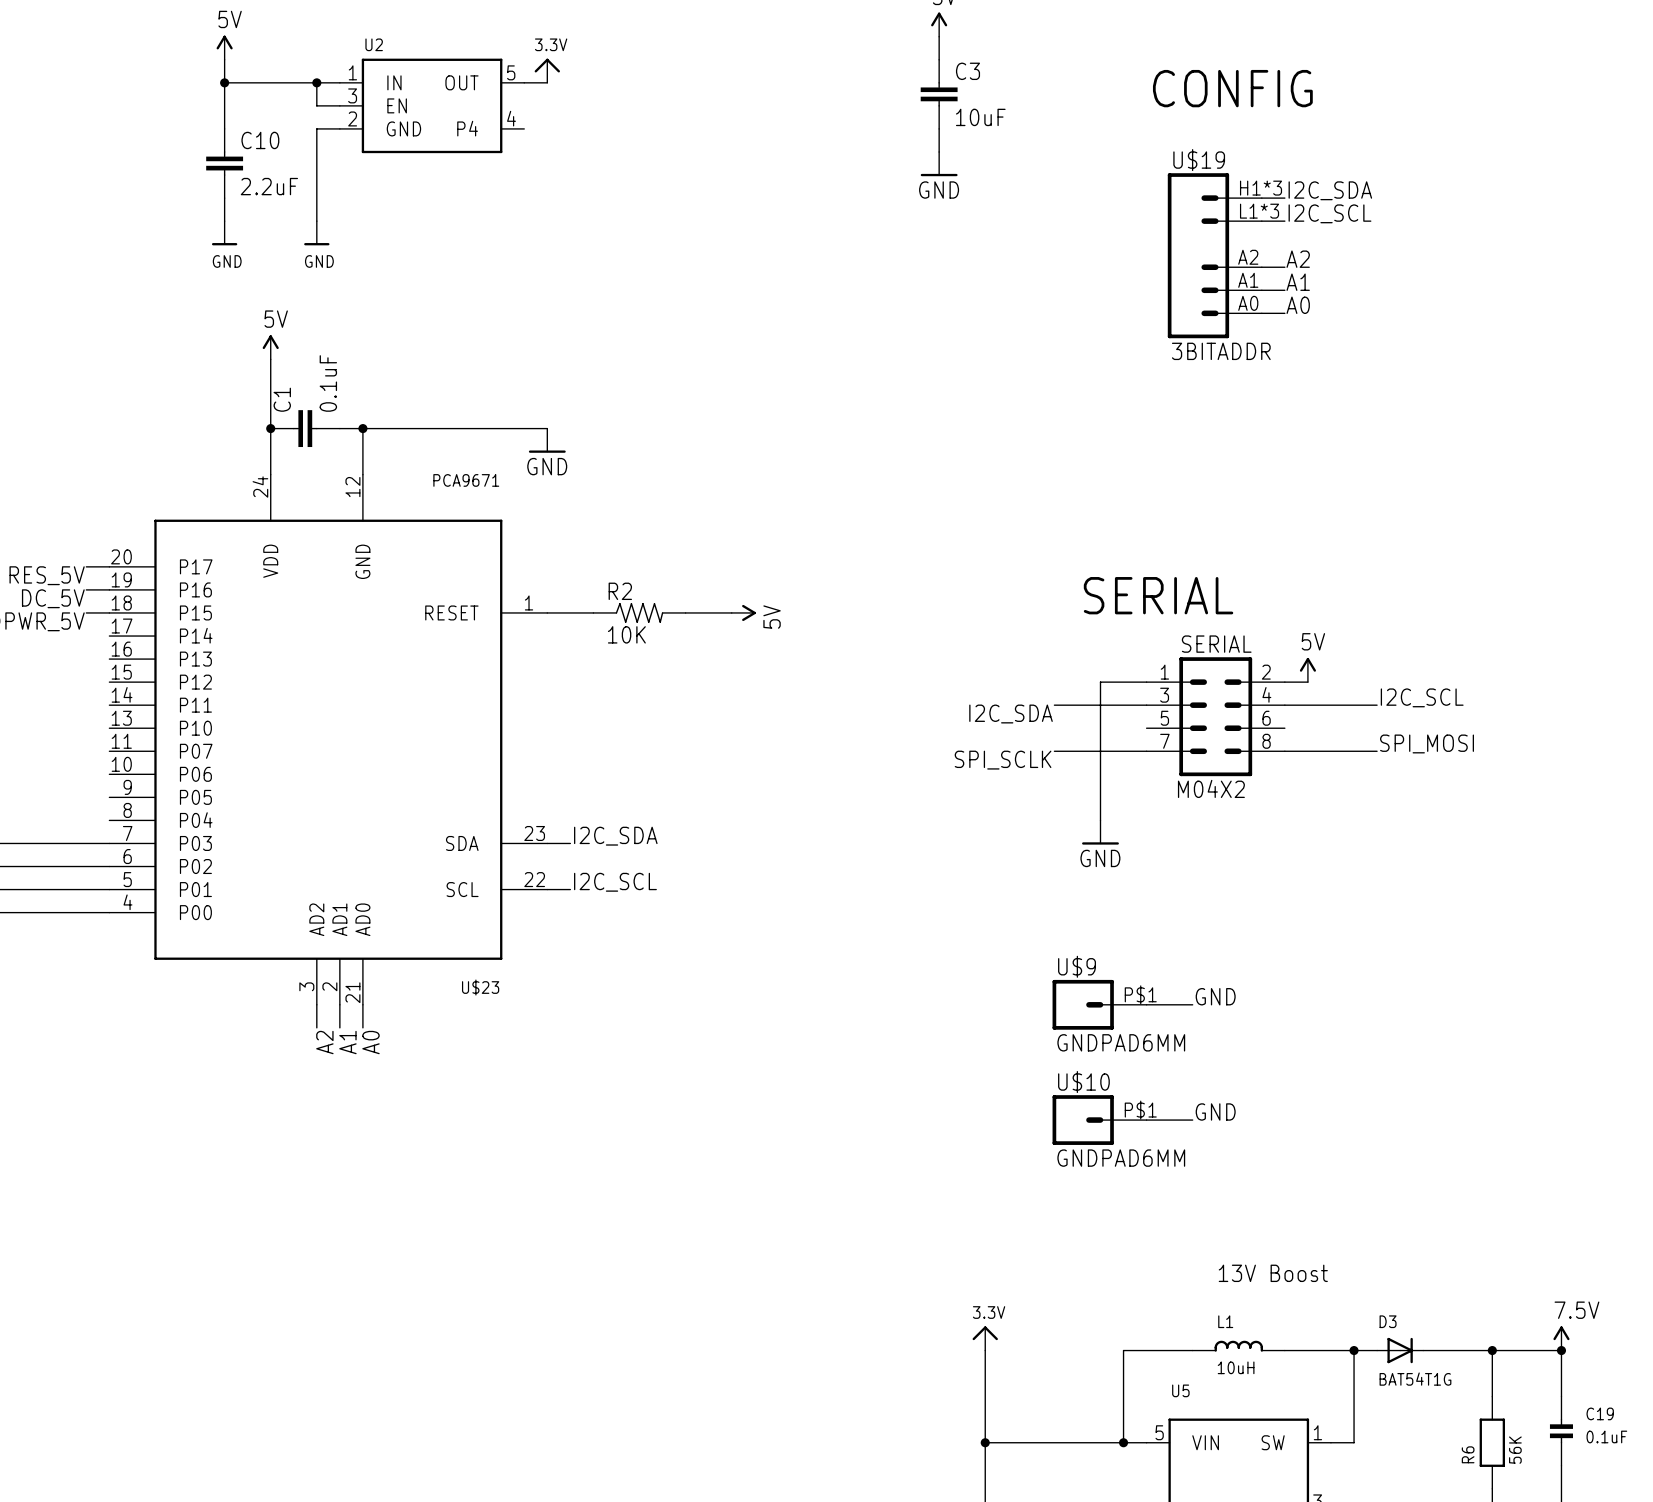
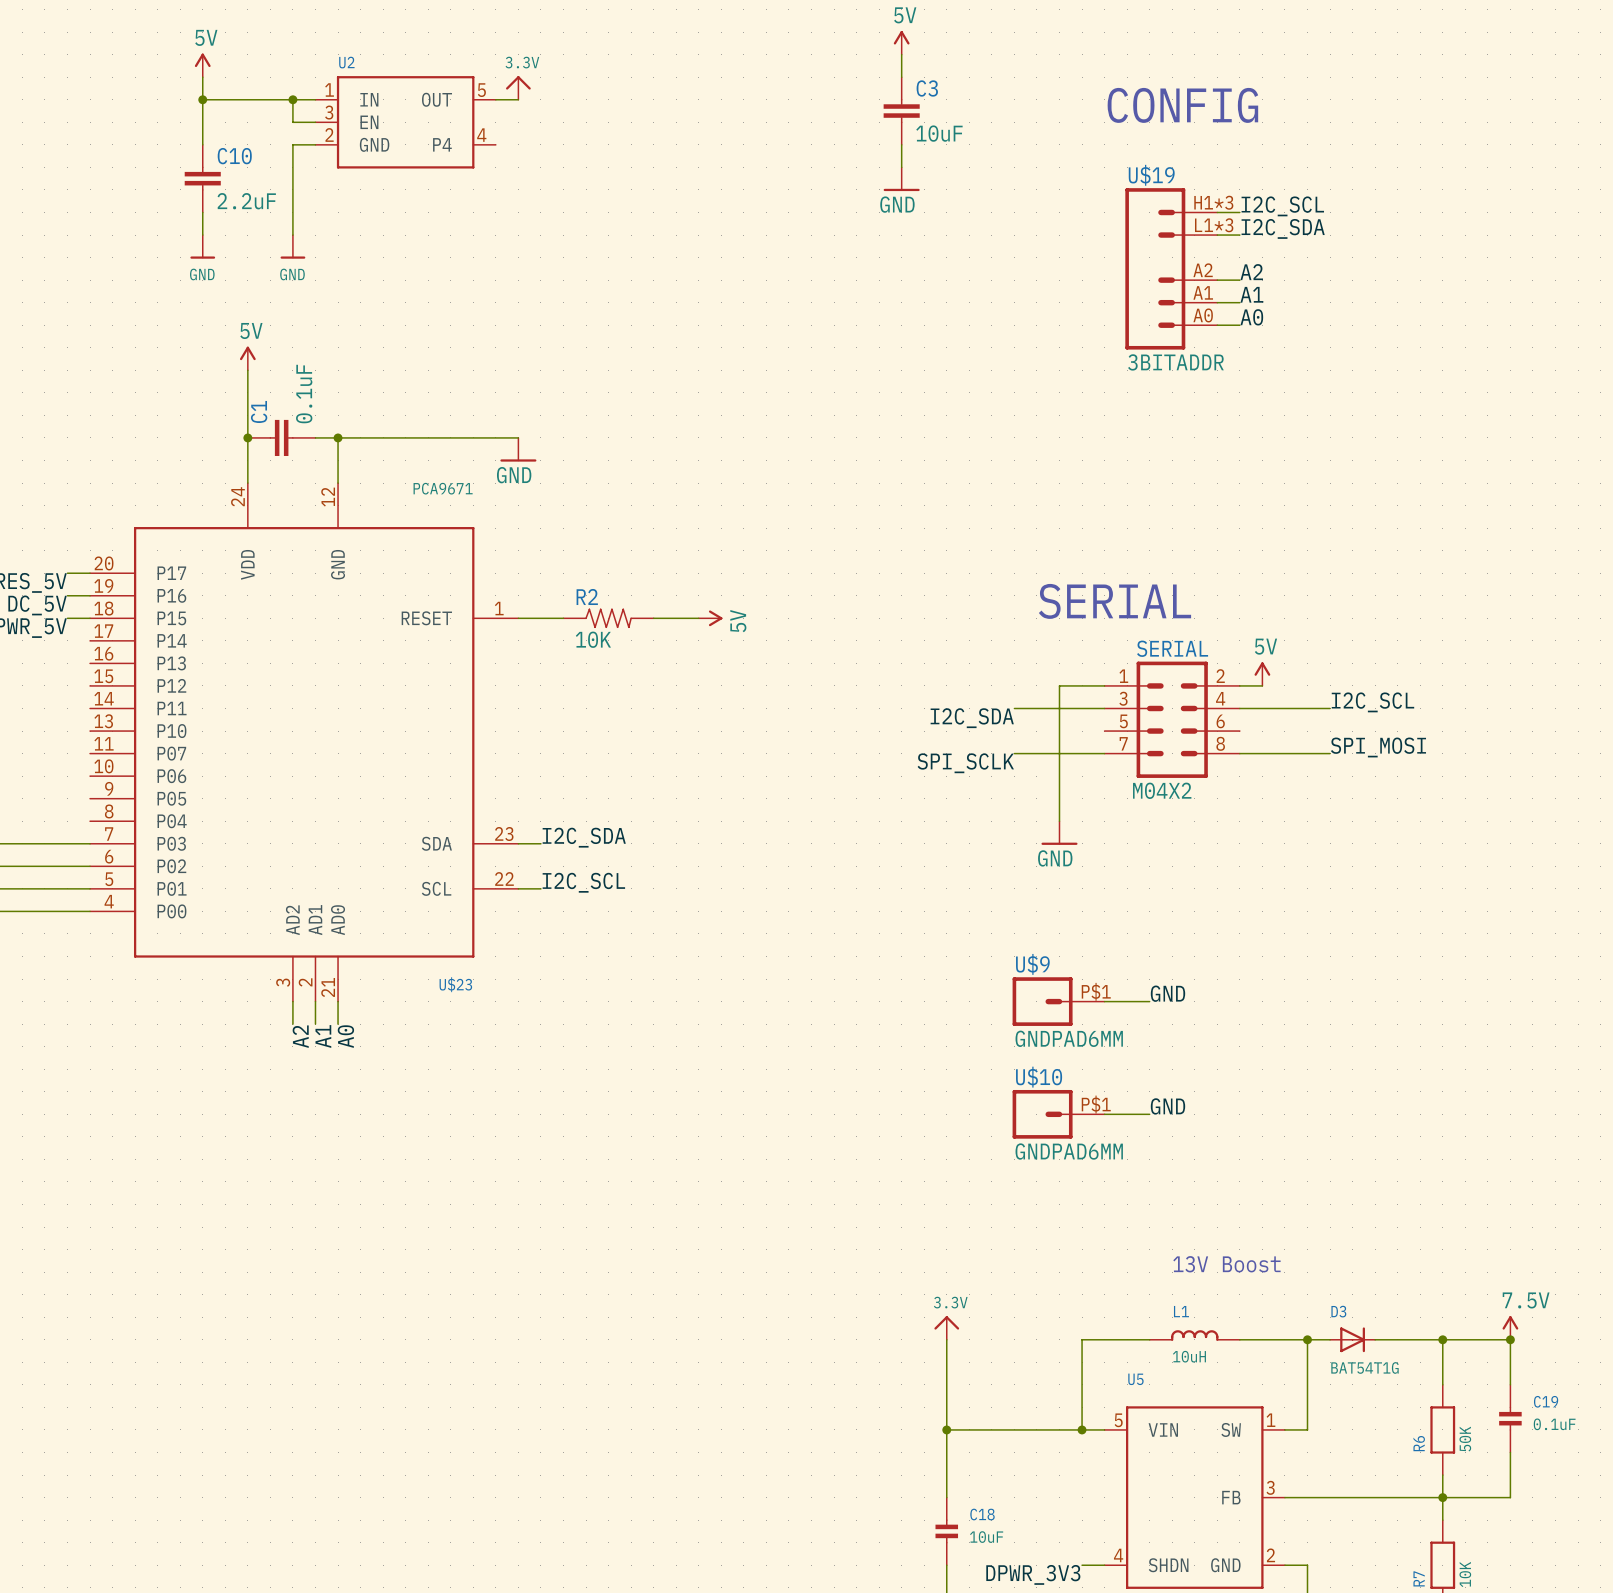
label: I2C_SDA (1330, 190) -> I2C_SCL (1282, 206)
label: I2C_SCL (1329, 213) -> I2C_SDA (1283, 228)
R6 value: 56K (1515, 1450) -> 50K (1465, 1439)

